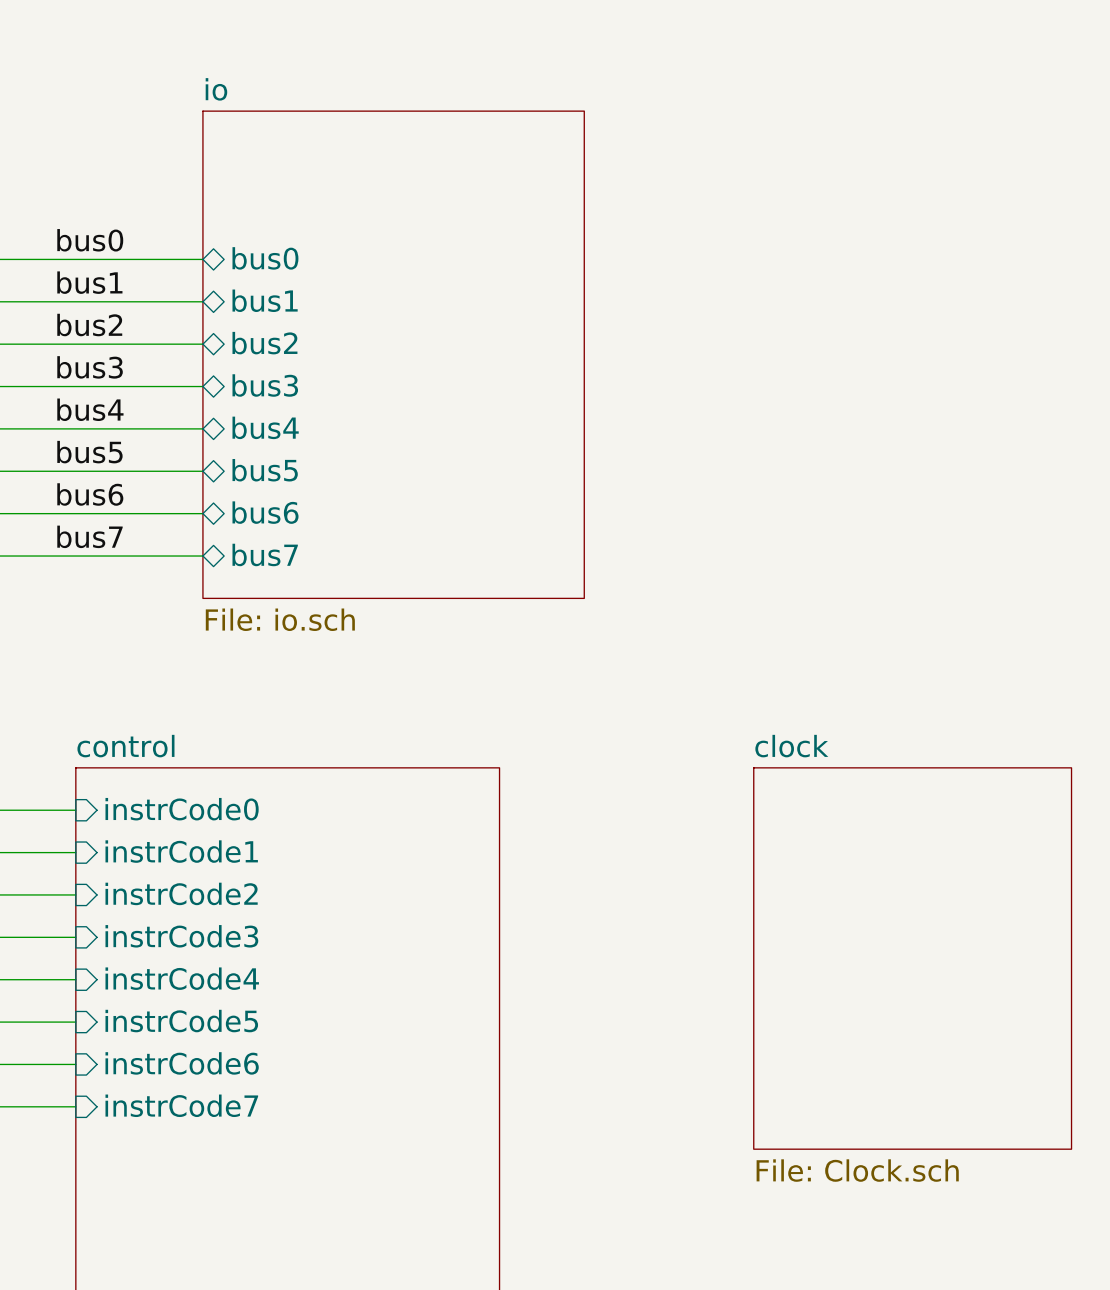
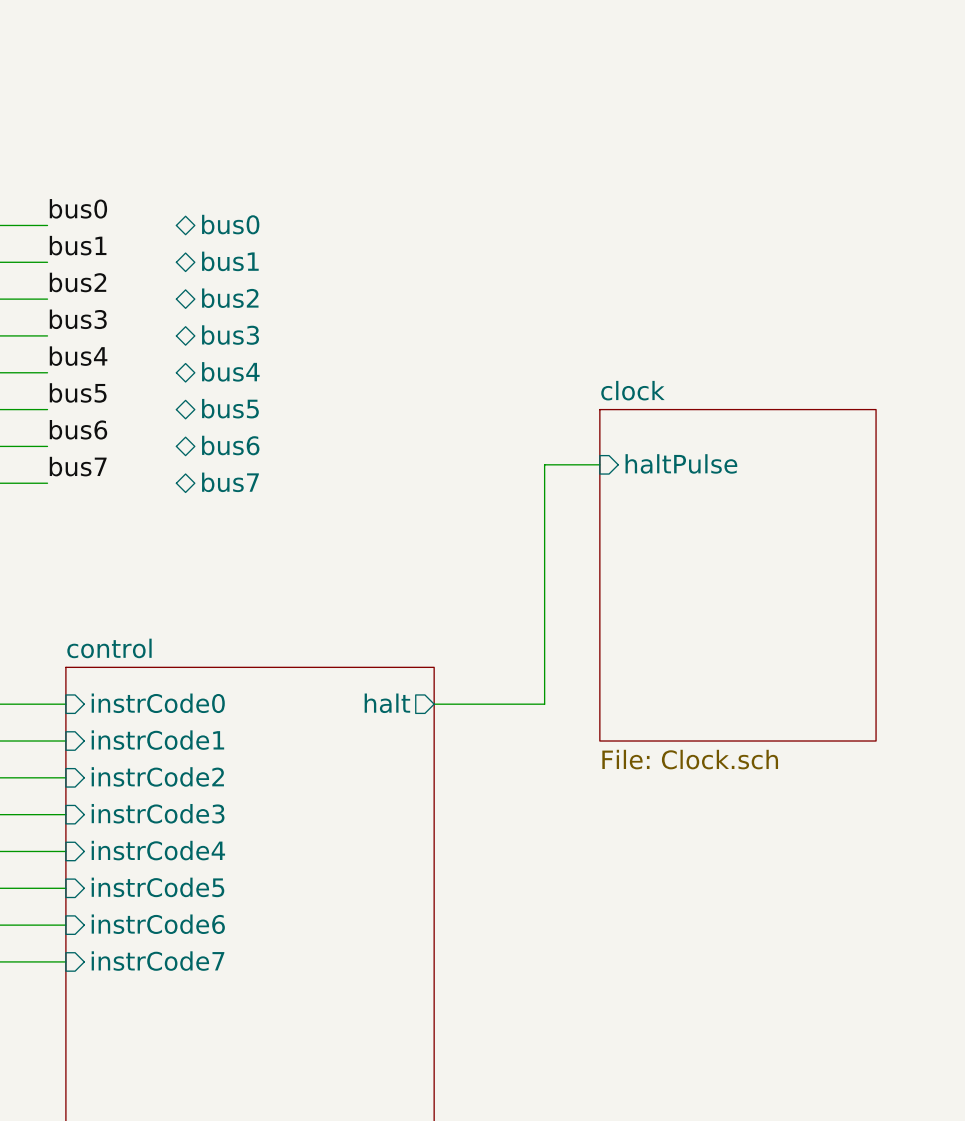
wire: (54, 259) (202, 259) -> none
wire: (54, 301) (202, 301) -> none
wire: (54, 344) (202, 344) -> none
sheet io: File: io.sch (393, 354) -> none
wire: (54, 386) (202, 386) -> none
wire: (54, 428) (202, 428) -> none
wire: (54, 471) (202, 471) -> none
wire: (54, 513) (202, 513) -> none
sheet pin: none -> haltPulse (681, 463)
wire: none -> (599, 464) (544, 464) (544, 704) (434, 704)
wire: (54, 556) (202, 556) -> none
sheet pin: none -> halt (387, 703)
sheet clock position: (912, 958) -> (737, 575)

